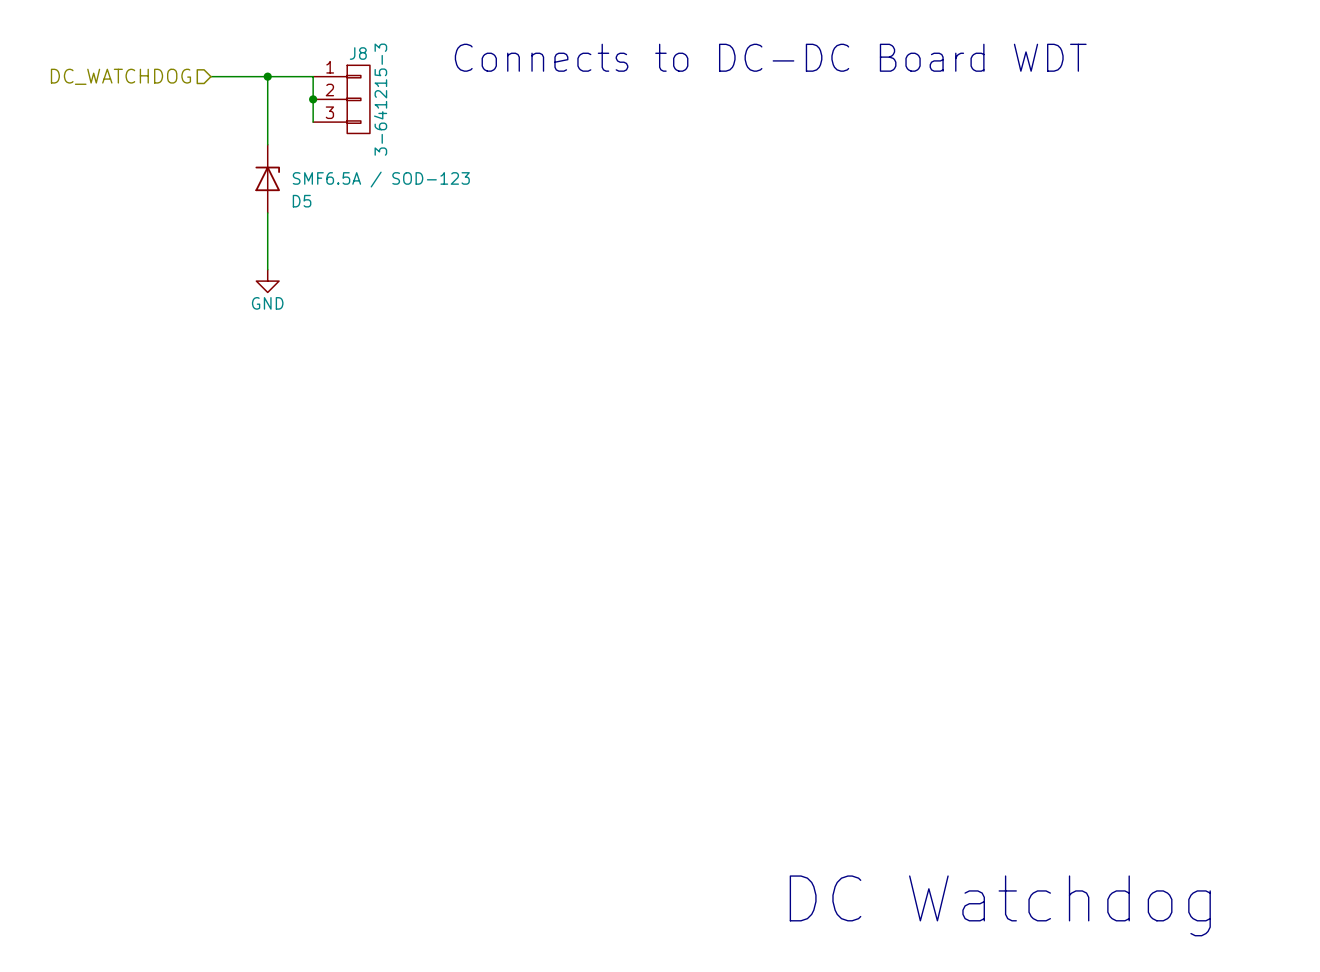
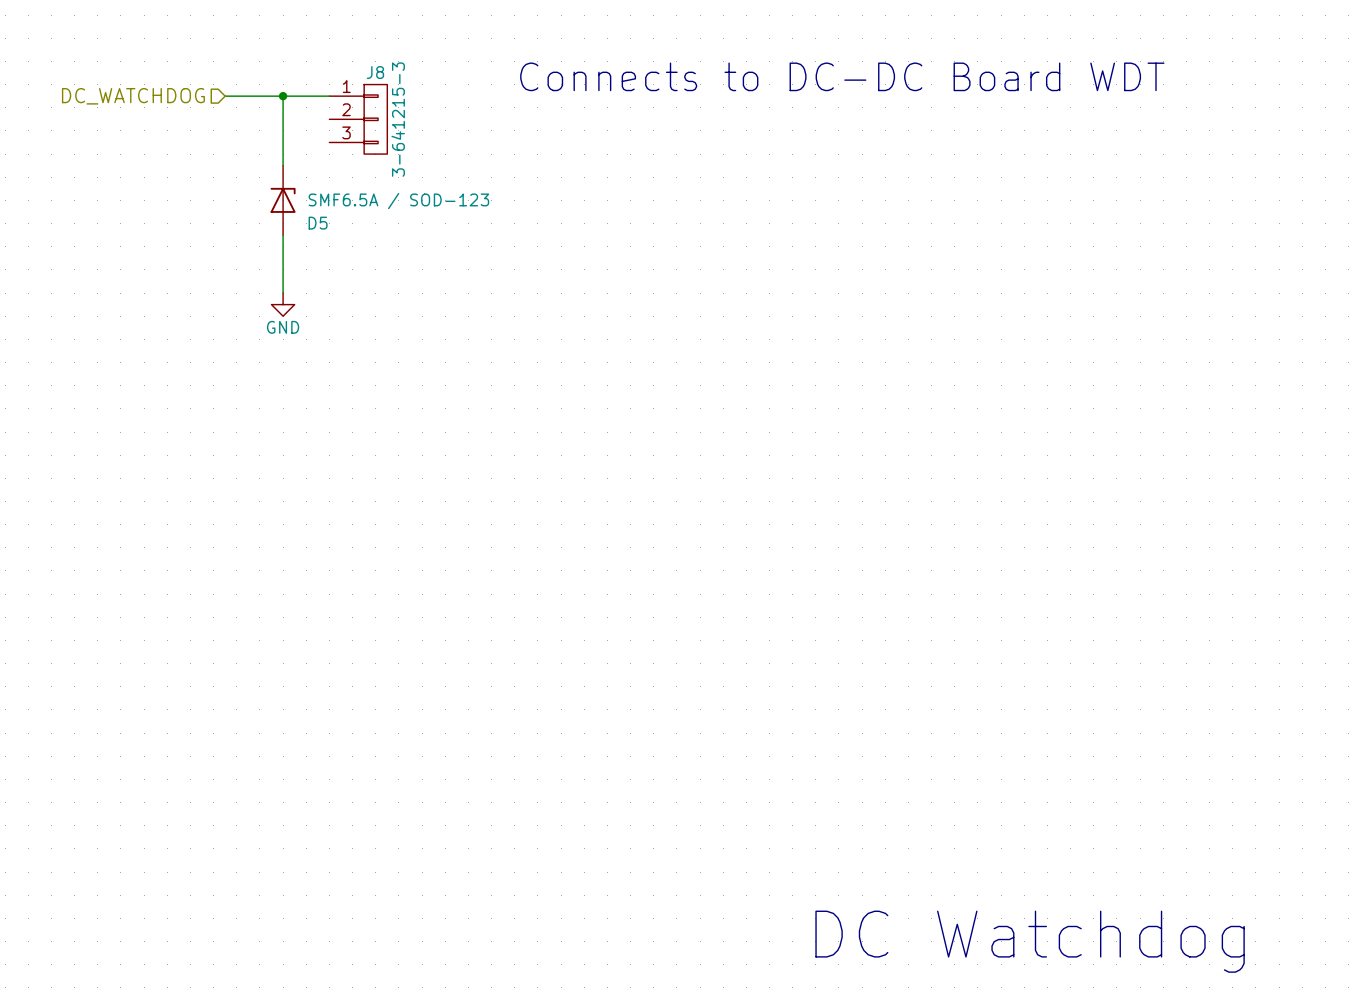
text position: Connects to DC-DC Board WDT (770, 57) -> Connects to DC-DC Board WDT (842, 76)
wire: (313, 76) (313, 122) -> none
junction: (313, 99) -> none

